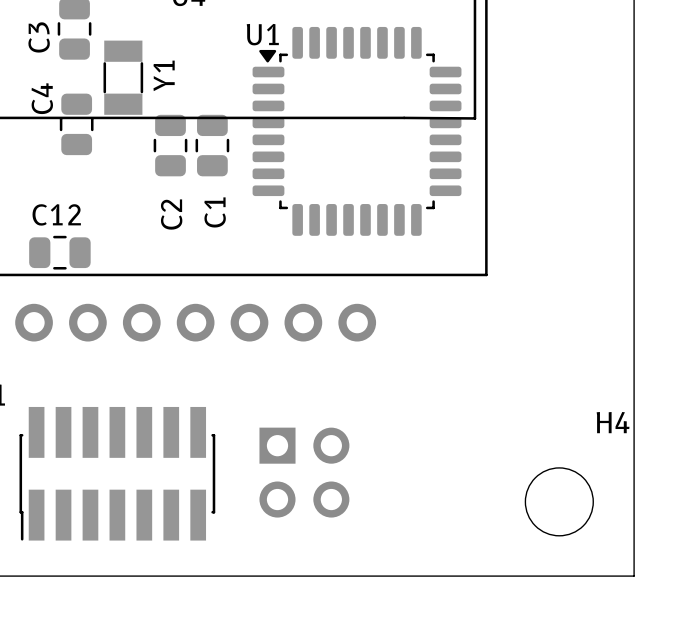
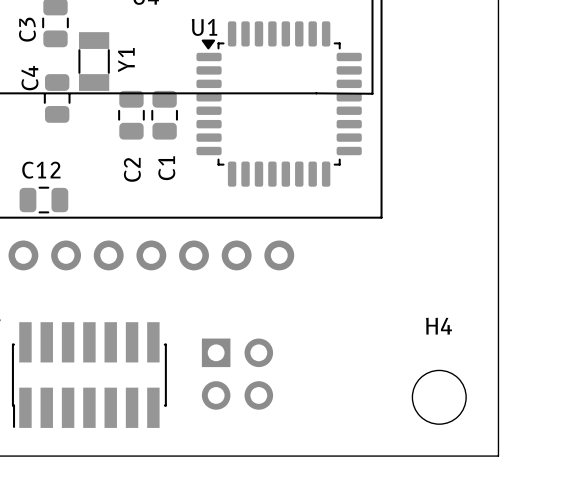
H4 name position: H4 (613, 422) -> H4 (439, 326)

